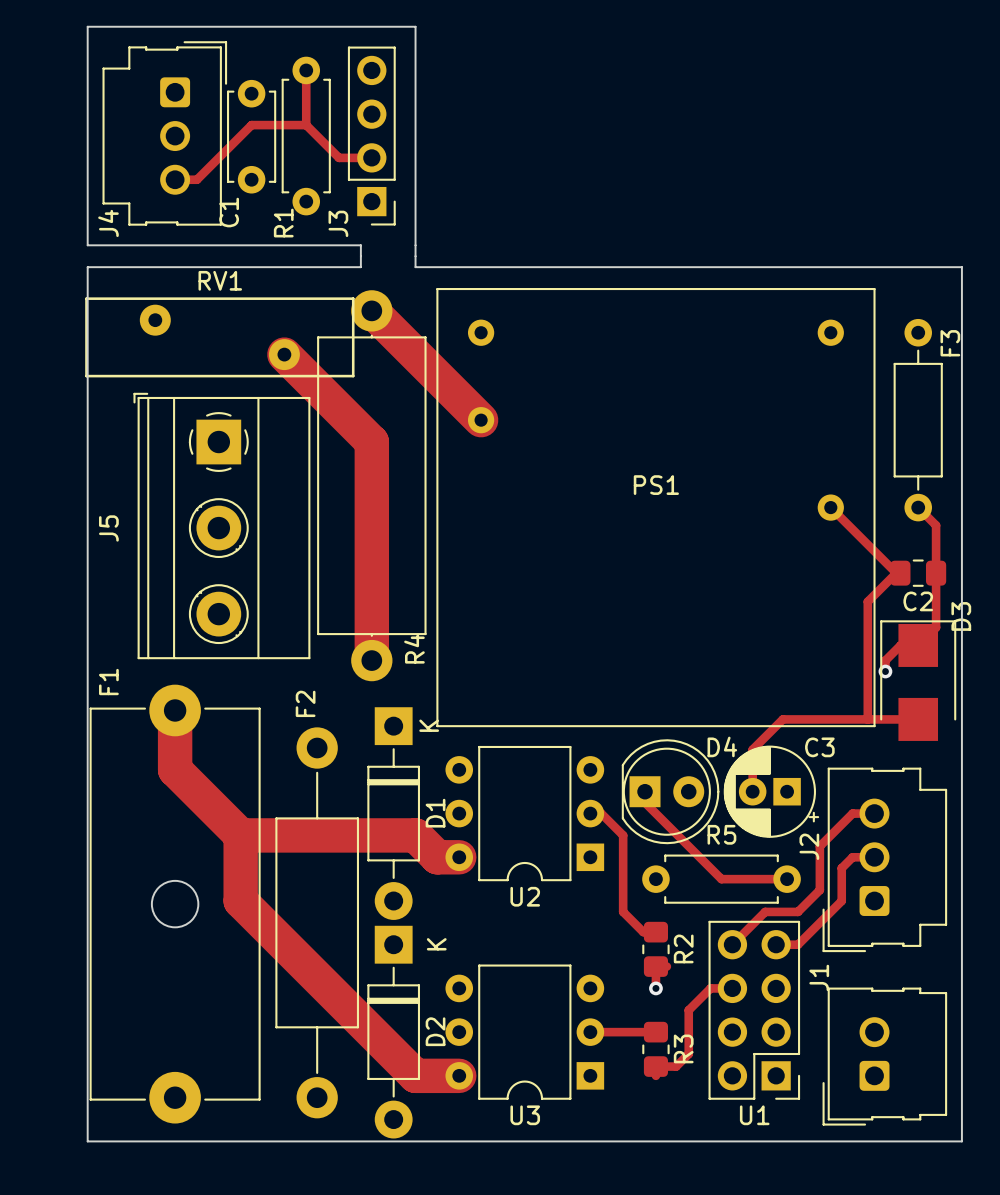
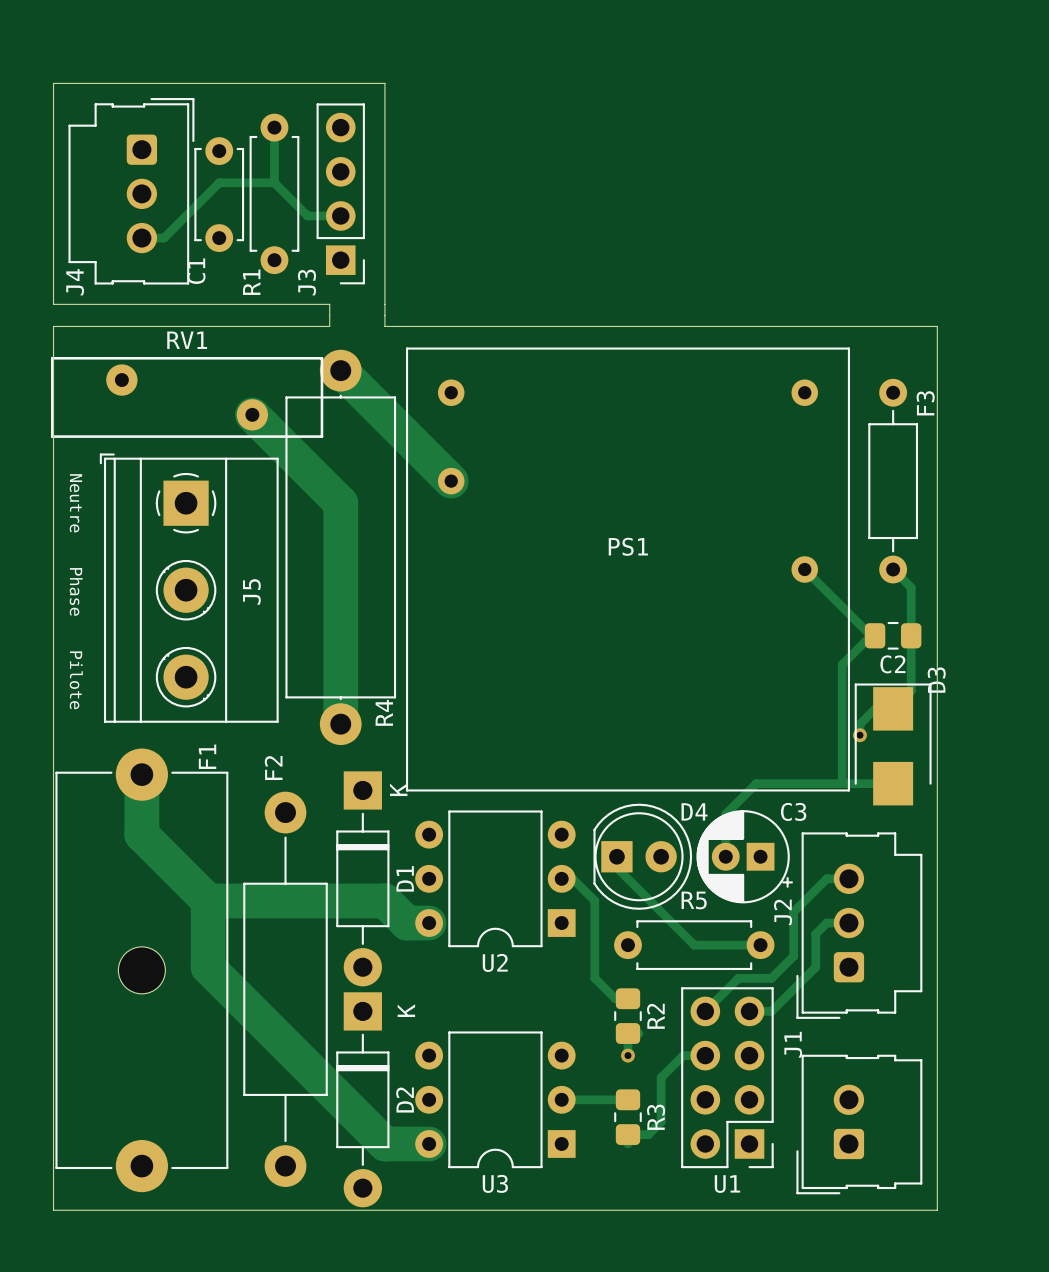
text: none -> Neutre (75, 503)
J5 name position: J5 (108, 528) -> J5 (251, 591)
text: none -> Phase (76, 591)
text: none -> Pilote (76, 680)
F1 name position: F1 (108, 682) -> F1 (207, 756)

